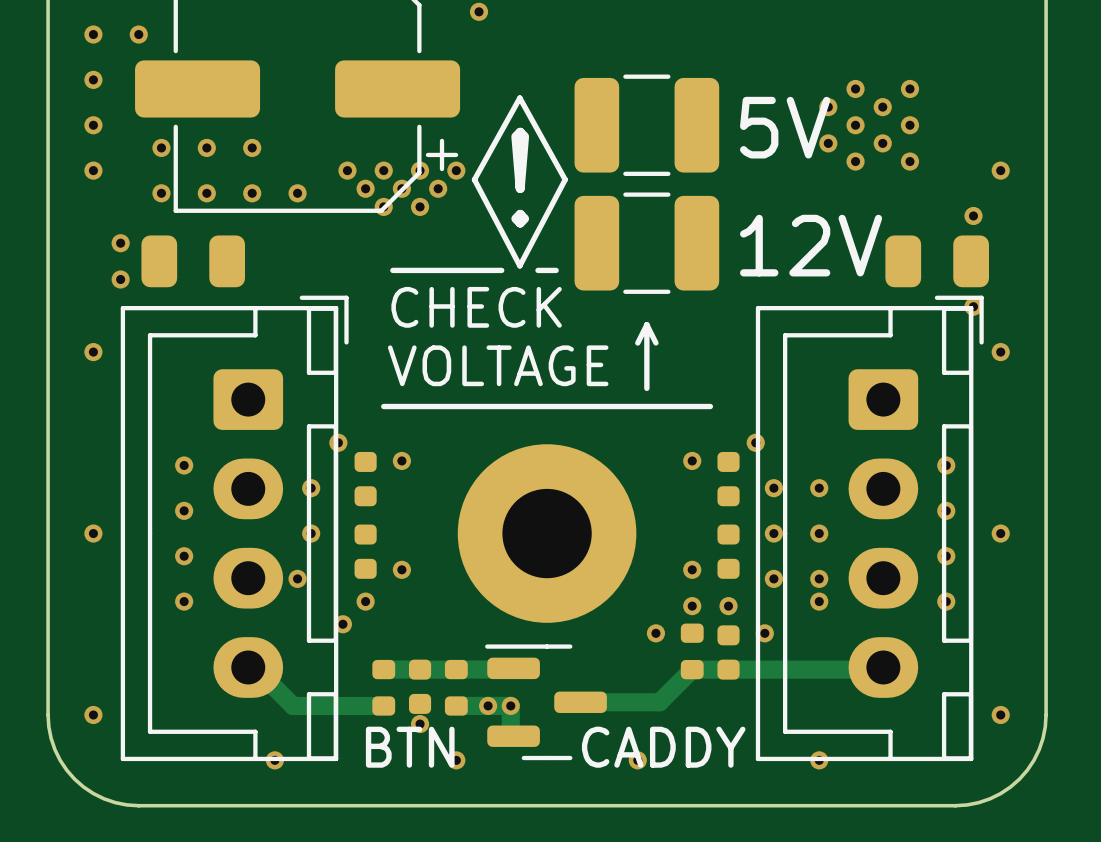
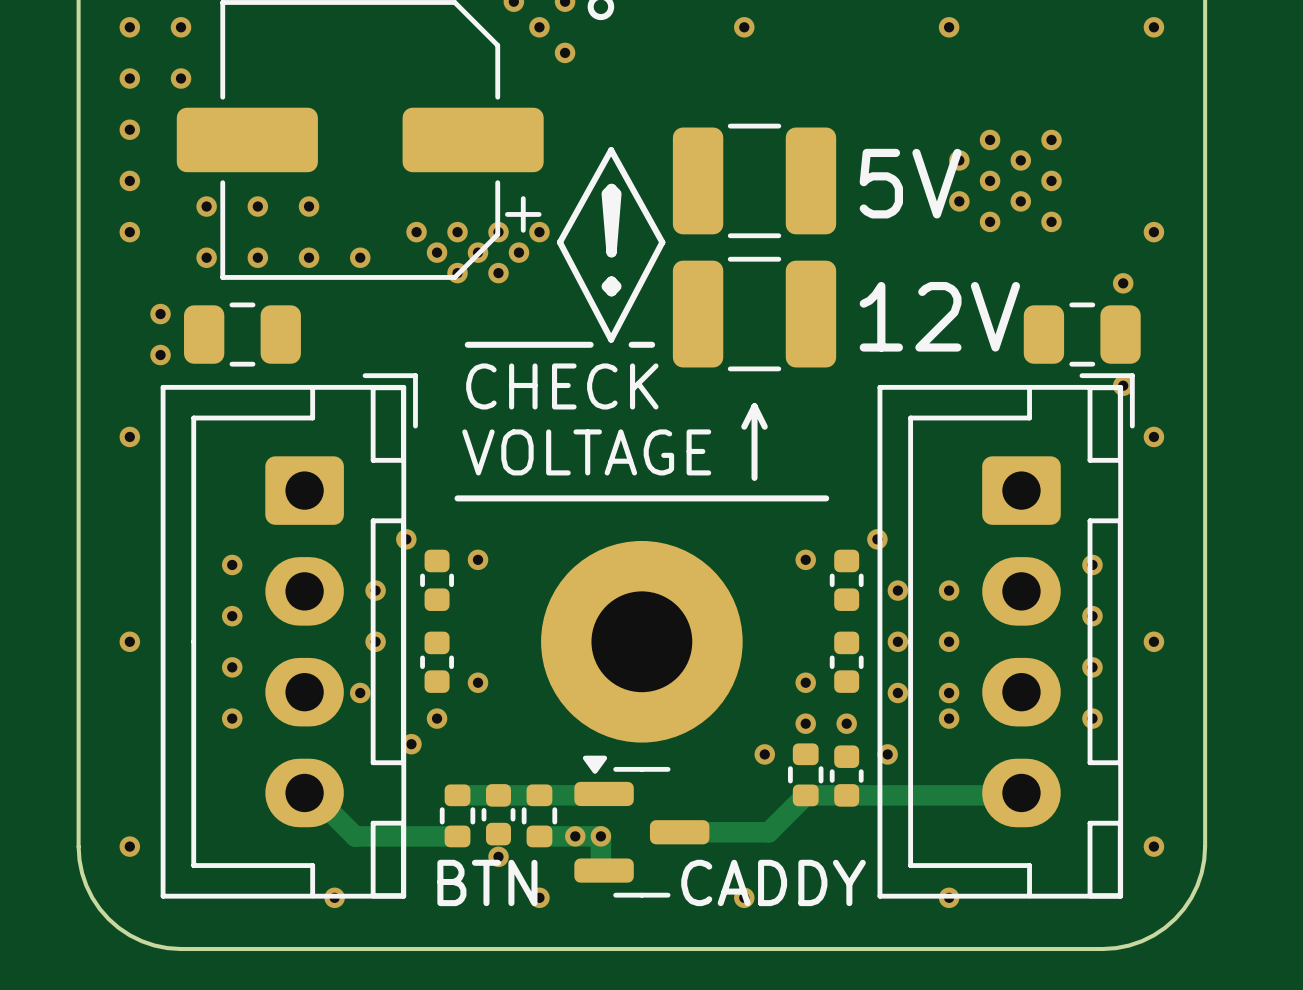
part footprint: [141, 235, 246, 288] -> [184, 302, 301, 367]
part footprint: [885, 235, 990, 288] -> [1023, 302, 1141, 367]
part footprint: [354, 451, 377, 507] -> [420, 549, 454, 611]
part footprint: [717, 451, 740, 507] -> [829, 549, 864, 611]
part footprint: [354, 524, 377, 579] -> [420, 631, 454, 693]
part footprint: [717, 524, 740, 579] -> [829, 631, 864, 693]
part footprint: [680, 623, 704, 680] -> [787, 743, 824, 807]
part footprint: [717, 625, 740, 680] -> [829, 745, 864, 807]
part footprint: [485, 644, 607, 761] -> [574, 755, 710, 898]
part footprint: [372, 659, 396, 716] -> [439, 784, 476, 848]
part footprint: [408, 659, 432, 714] -> [481, 784, 516, 846]
part footprint: [444, 659, 468, 716] -> [521, 784, 558, 848]

